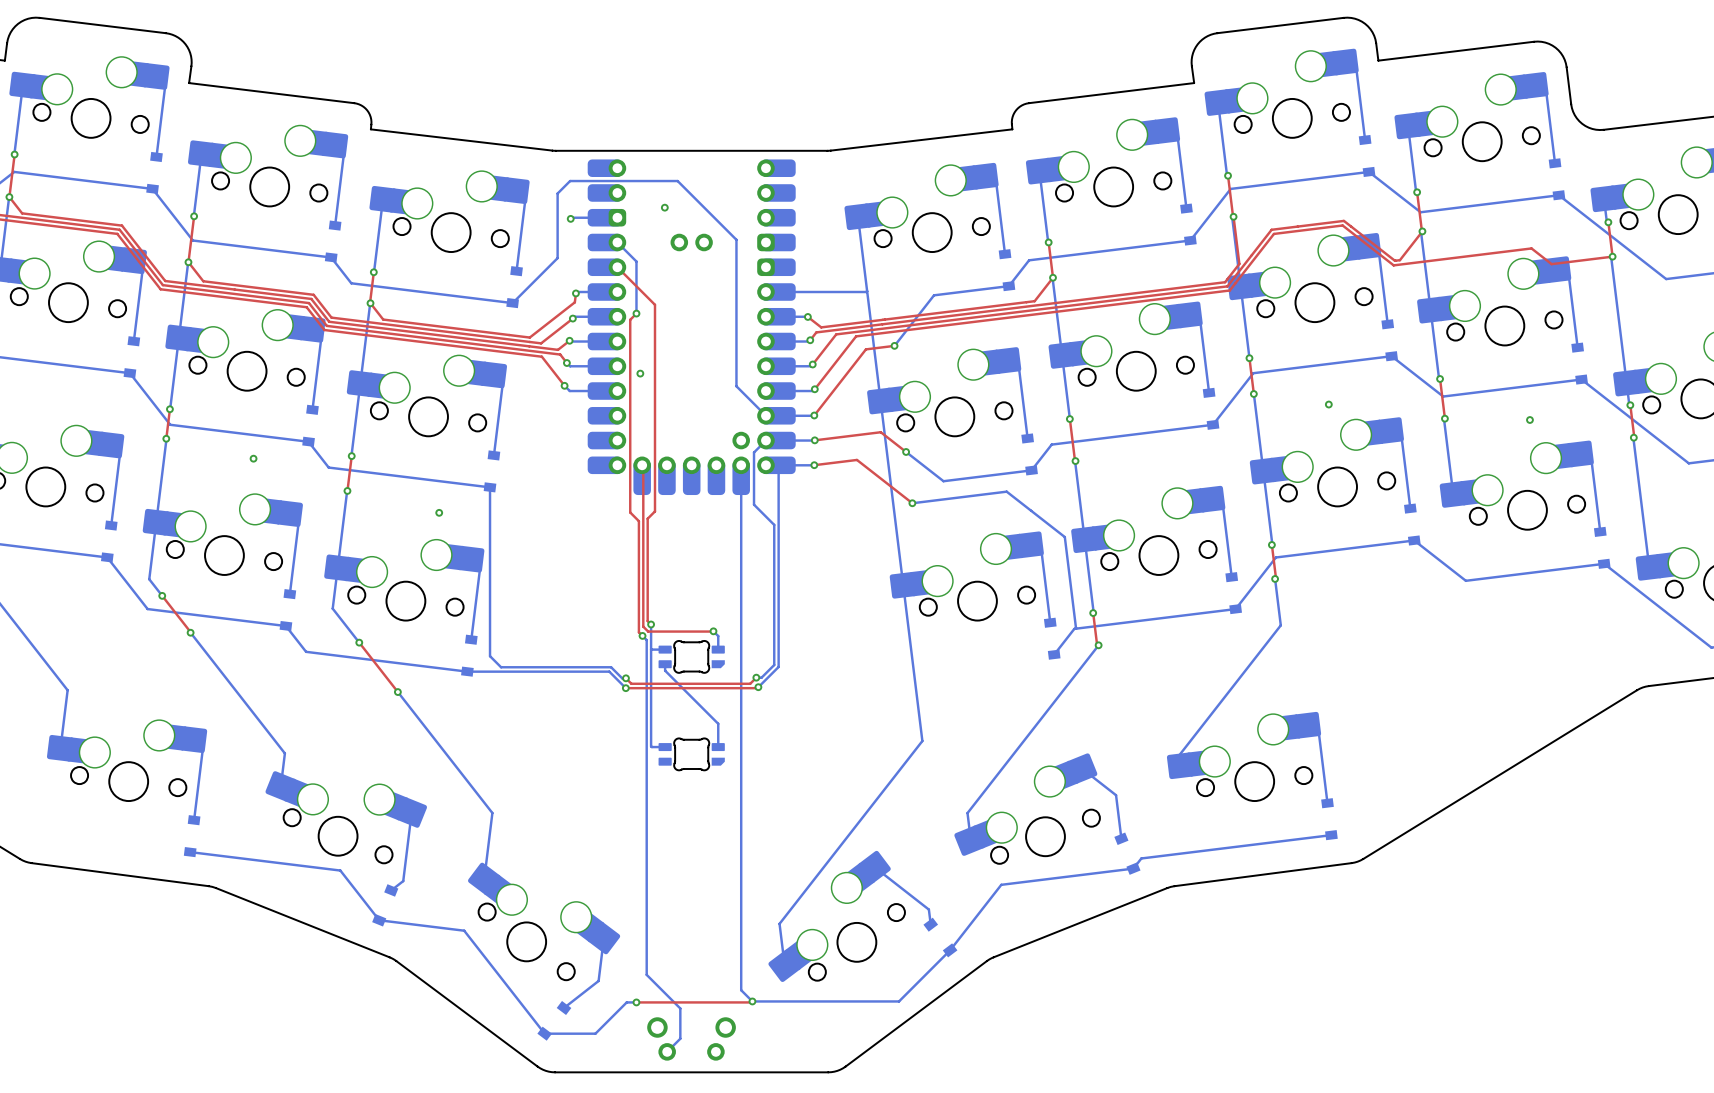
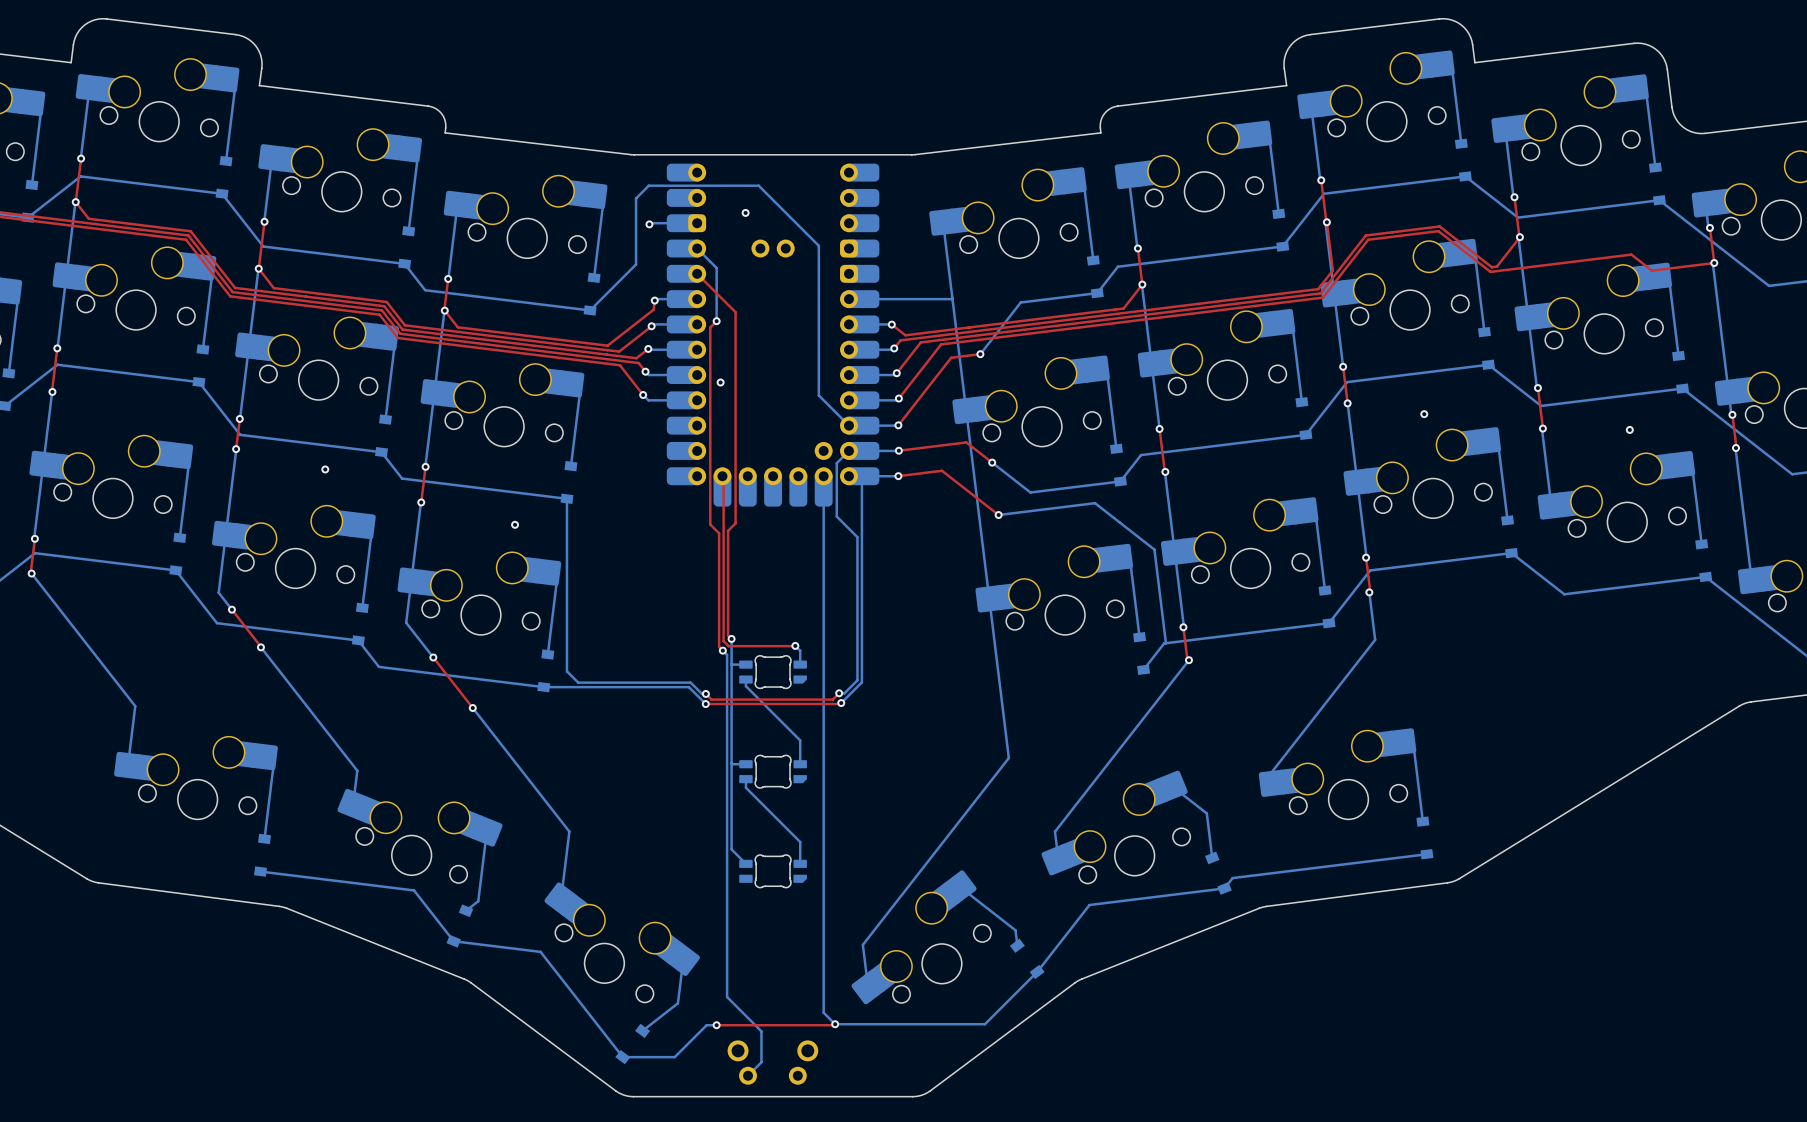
bottom track: none -> (731, 763) (731, 849) (745, 863)
bottom track: none -> (745, 779) (745, 787) (800, 842) (800, 863)
part: none -> (773, 871)

